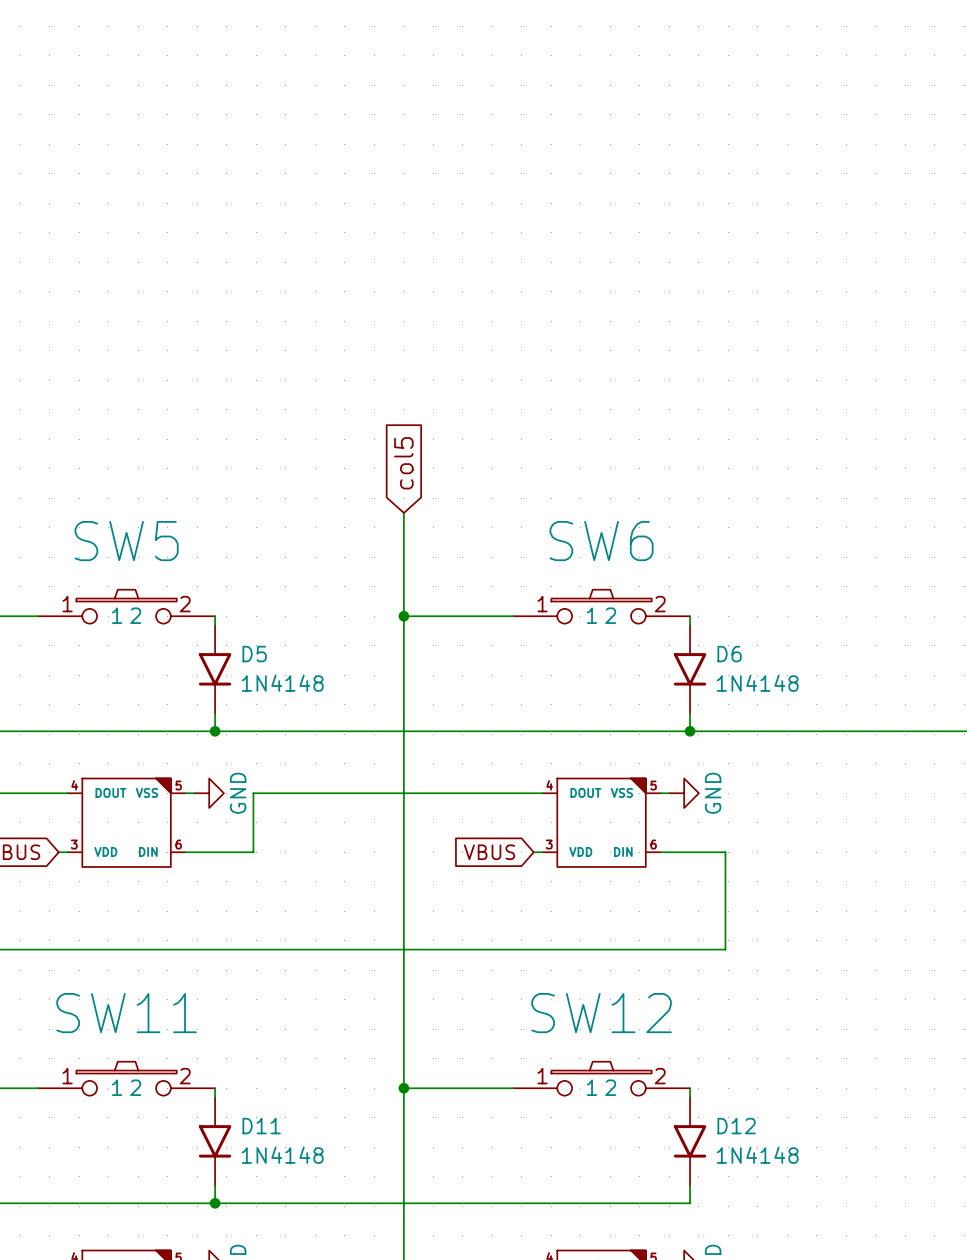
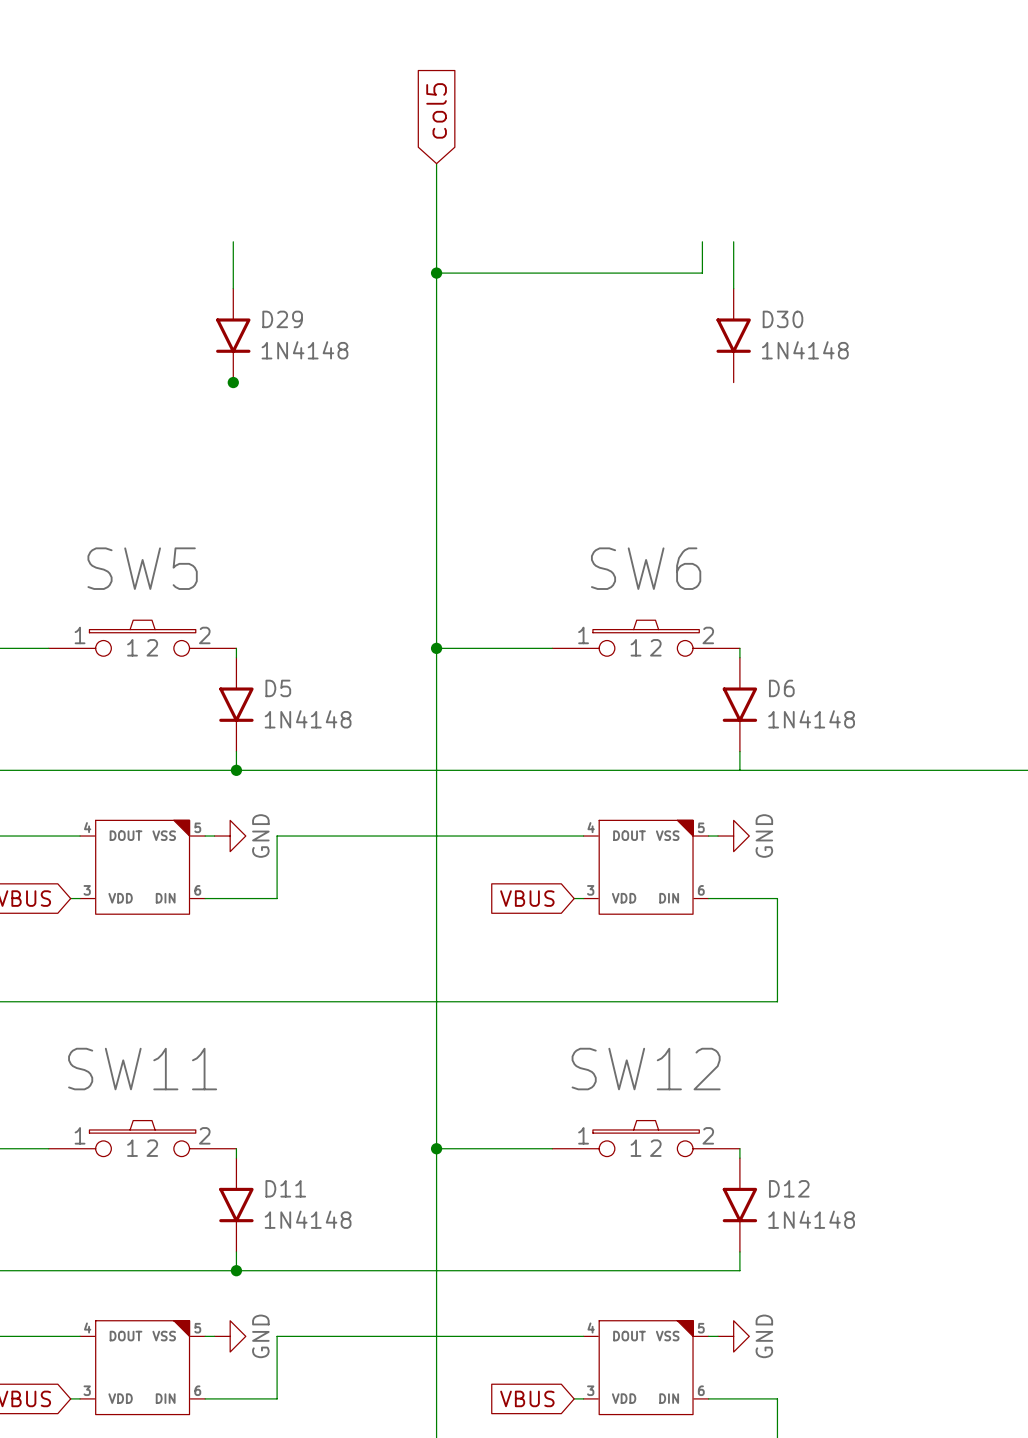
global label: none -> col5 (436, 110)
wire: none -> (436, 163) (436, 538)
wire: none -> (233, 241) (233, 288)
wire: none -> (702, 241) (702, 273) (436, 273)
wire: none -> (733, 241) (733, 288)
junction: none -> (436, 273)
D29: none -> 1N4148 (233, 335)
D30: none -> 1N4148 (733, 335)
junction: none -> (233, 382)
global label: col5 (403, 463) -> none
junction: (690, 731) -> none

